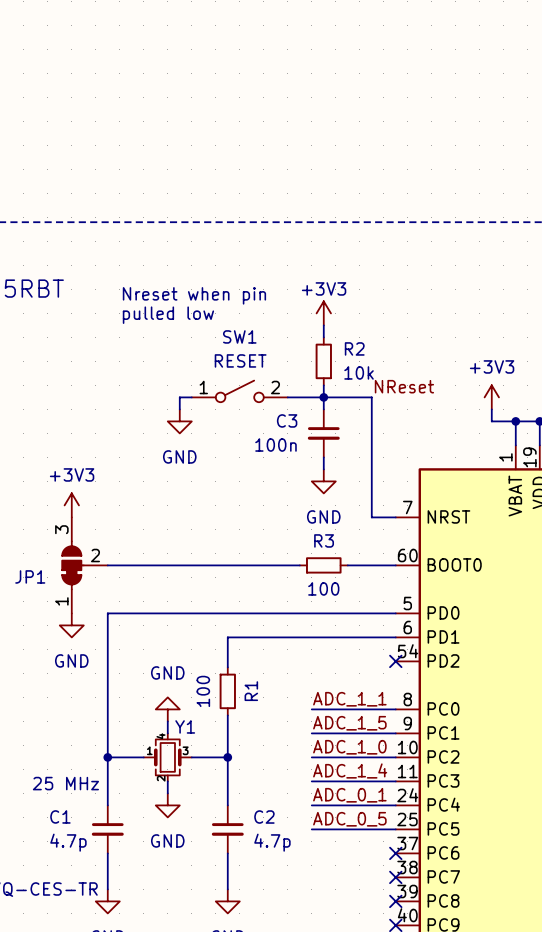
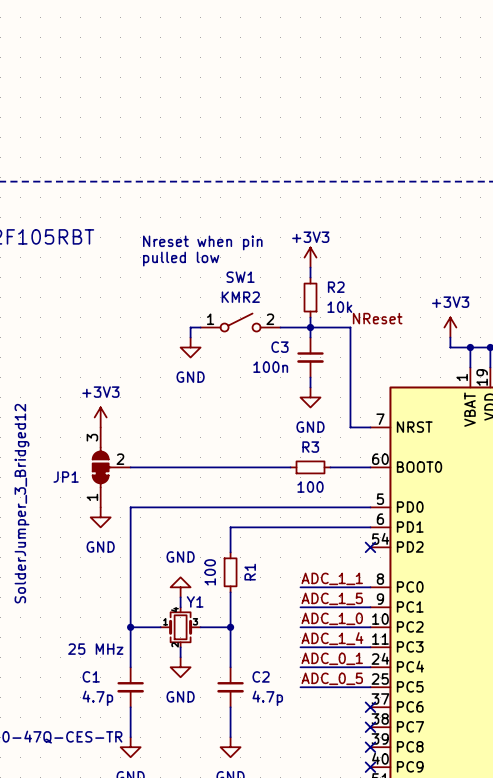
SW1 value: RESET (240, 360) -> KMR2 (240, 297)

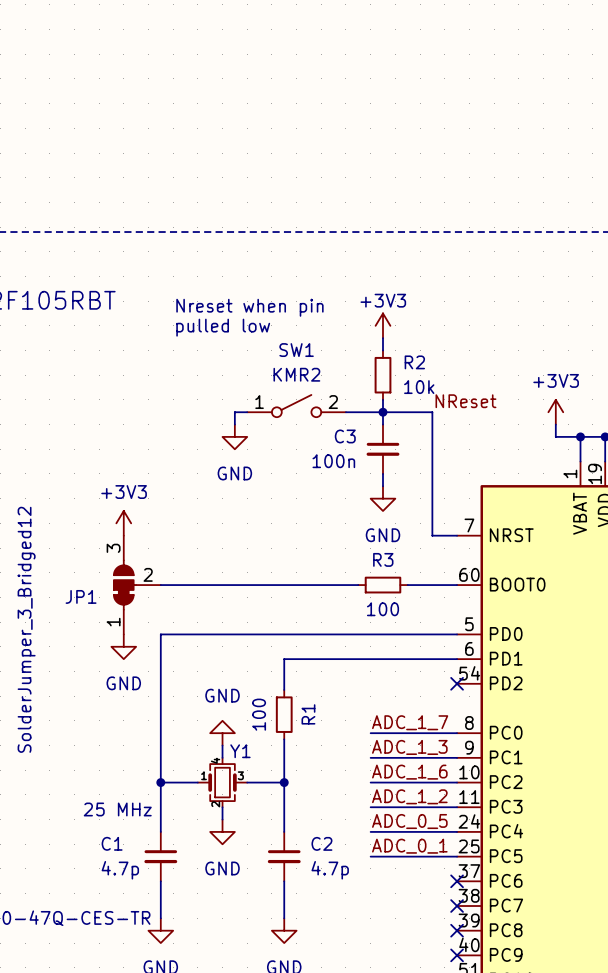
label: ADC_1_1 (332, 578) -> ADC_1_7 (410, 722)
label: ADC_1_5 (332, 598) -> ADC_1_3 (409, 747)
label: ADC_1_0 (332, 618) -> ADC_1_6 (409, 772)
label: ADC_1_4 (332, 638) -> ADC_1_2 (409, 796)
label: ADC_0_1 (332, 658) -> ADC_0_5 (409, 821)
label: ADC_0_5 (332, 678) -> ADC_0_1 (409, 846)

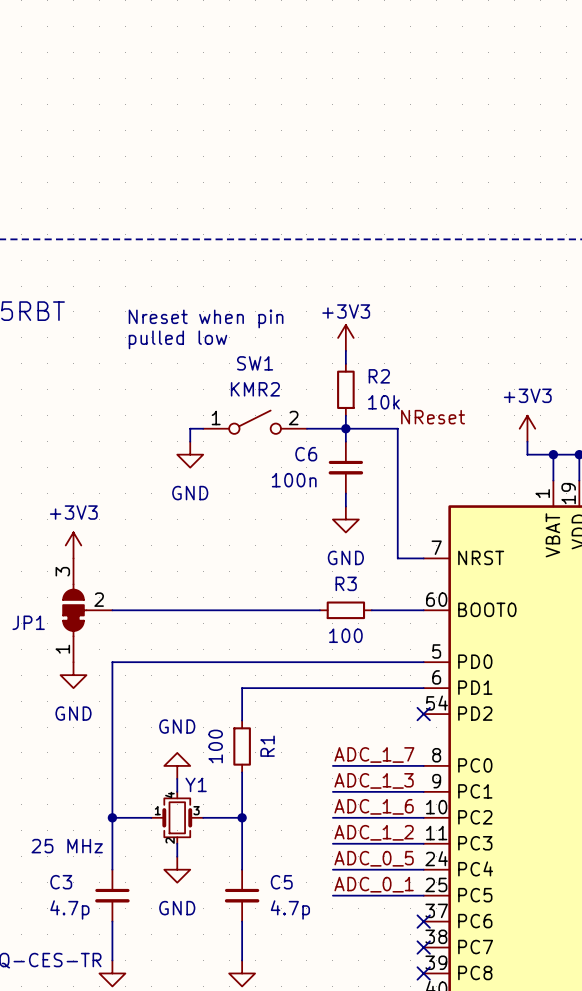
C3 name: C3 (345, 436) -> C6 (306, 454)
C1 name: C1 (112, 843) -> C3 (61, 882)
C2 name: C2 (321, 843) -> C5 (281, 882)

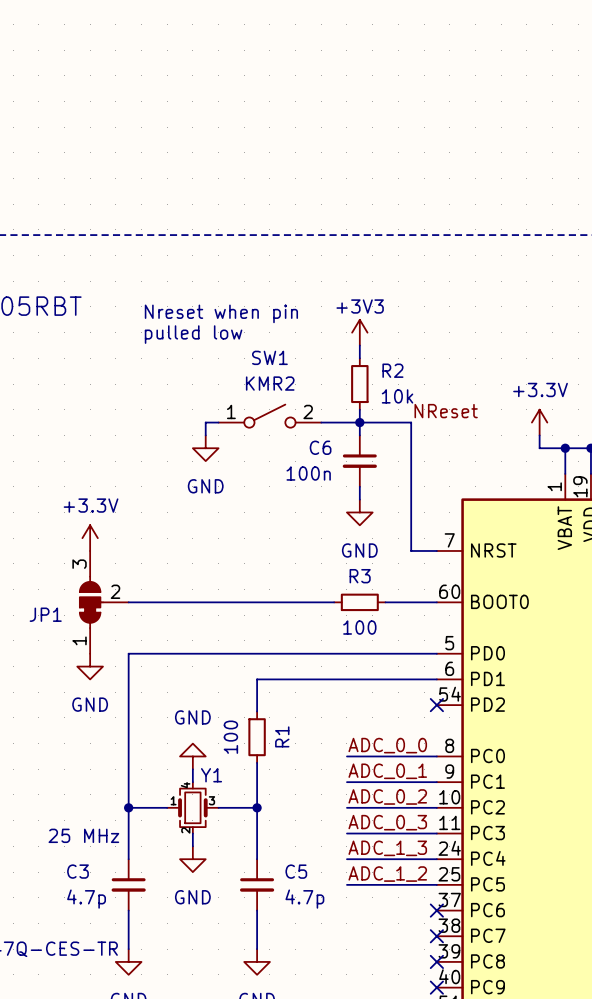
power symbol: +3V3 (527, 428) -> +3.3V (539, 422)
power symbol: +3V3 (73, 545) -> +3.3V (90, 538)
label: ADC_1_7 (374, 754) -> ADC_0_0 (387, 745)
label: ADC_1_3 (374, 780) -> ADC_0_1 (387, 771)
label: ADC_1_6 (374, 806) -> ADC_0_2 (387, 796)
label: ADC_1_2 (374, 832) -> ADC_0_3 (387, 822)
label: ADC_0_5 (374, 858) -> ADC_1_3 (387, 848)
label: ADC_0_1 (374, 884) -> ADC_1_2 (387, 874)

